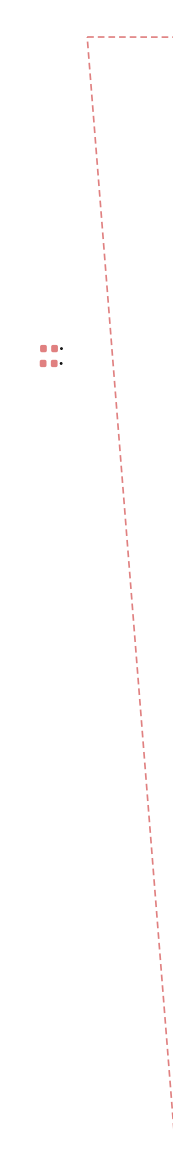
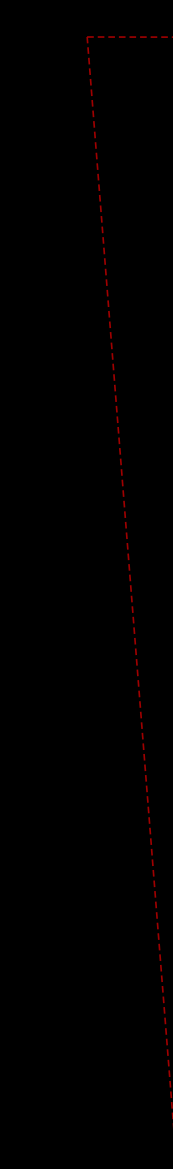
part: (51, 348) -> none
part: (51, 363) -> none

